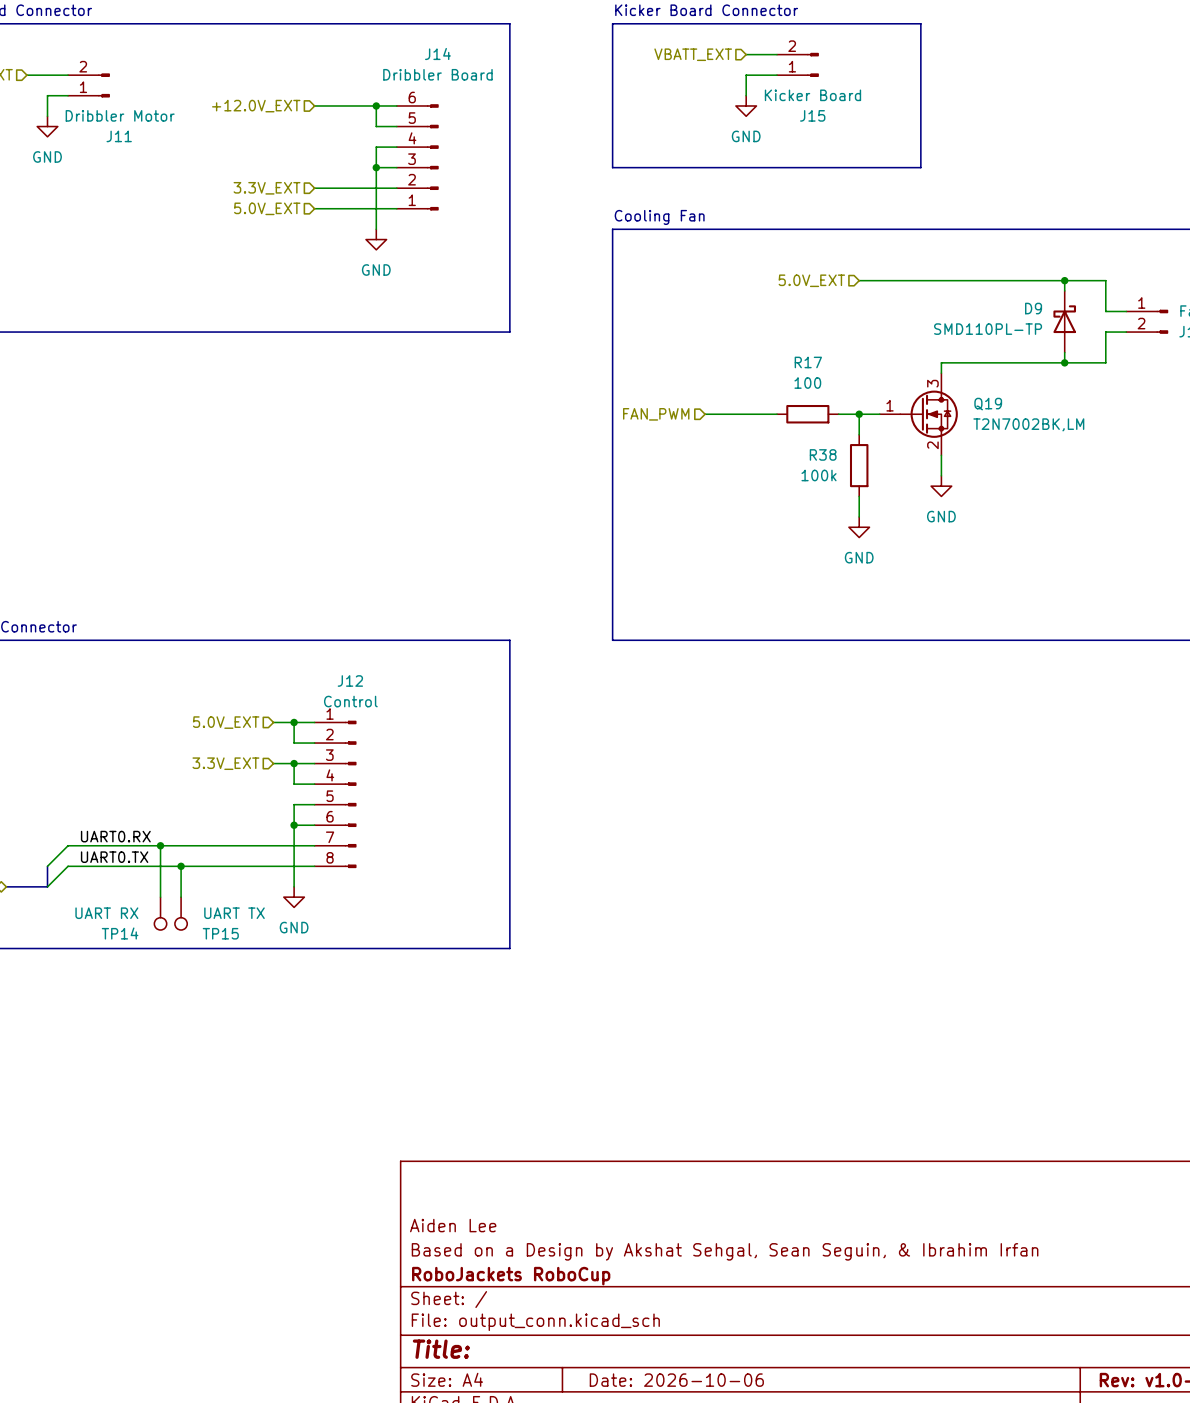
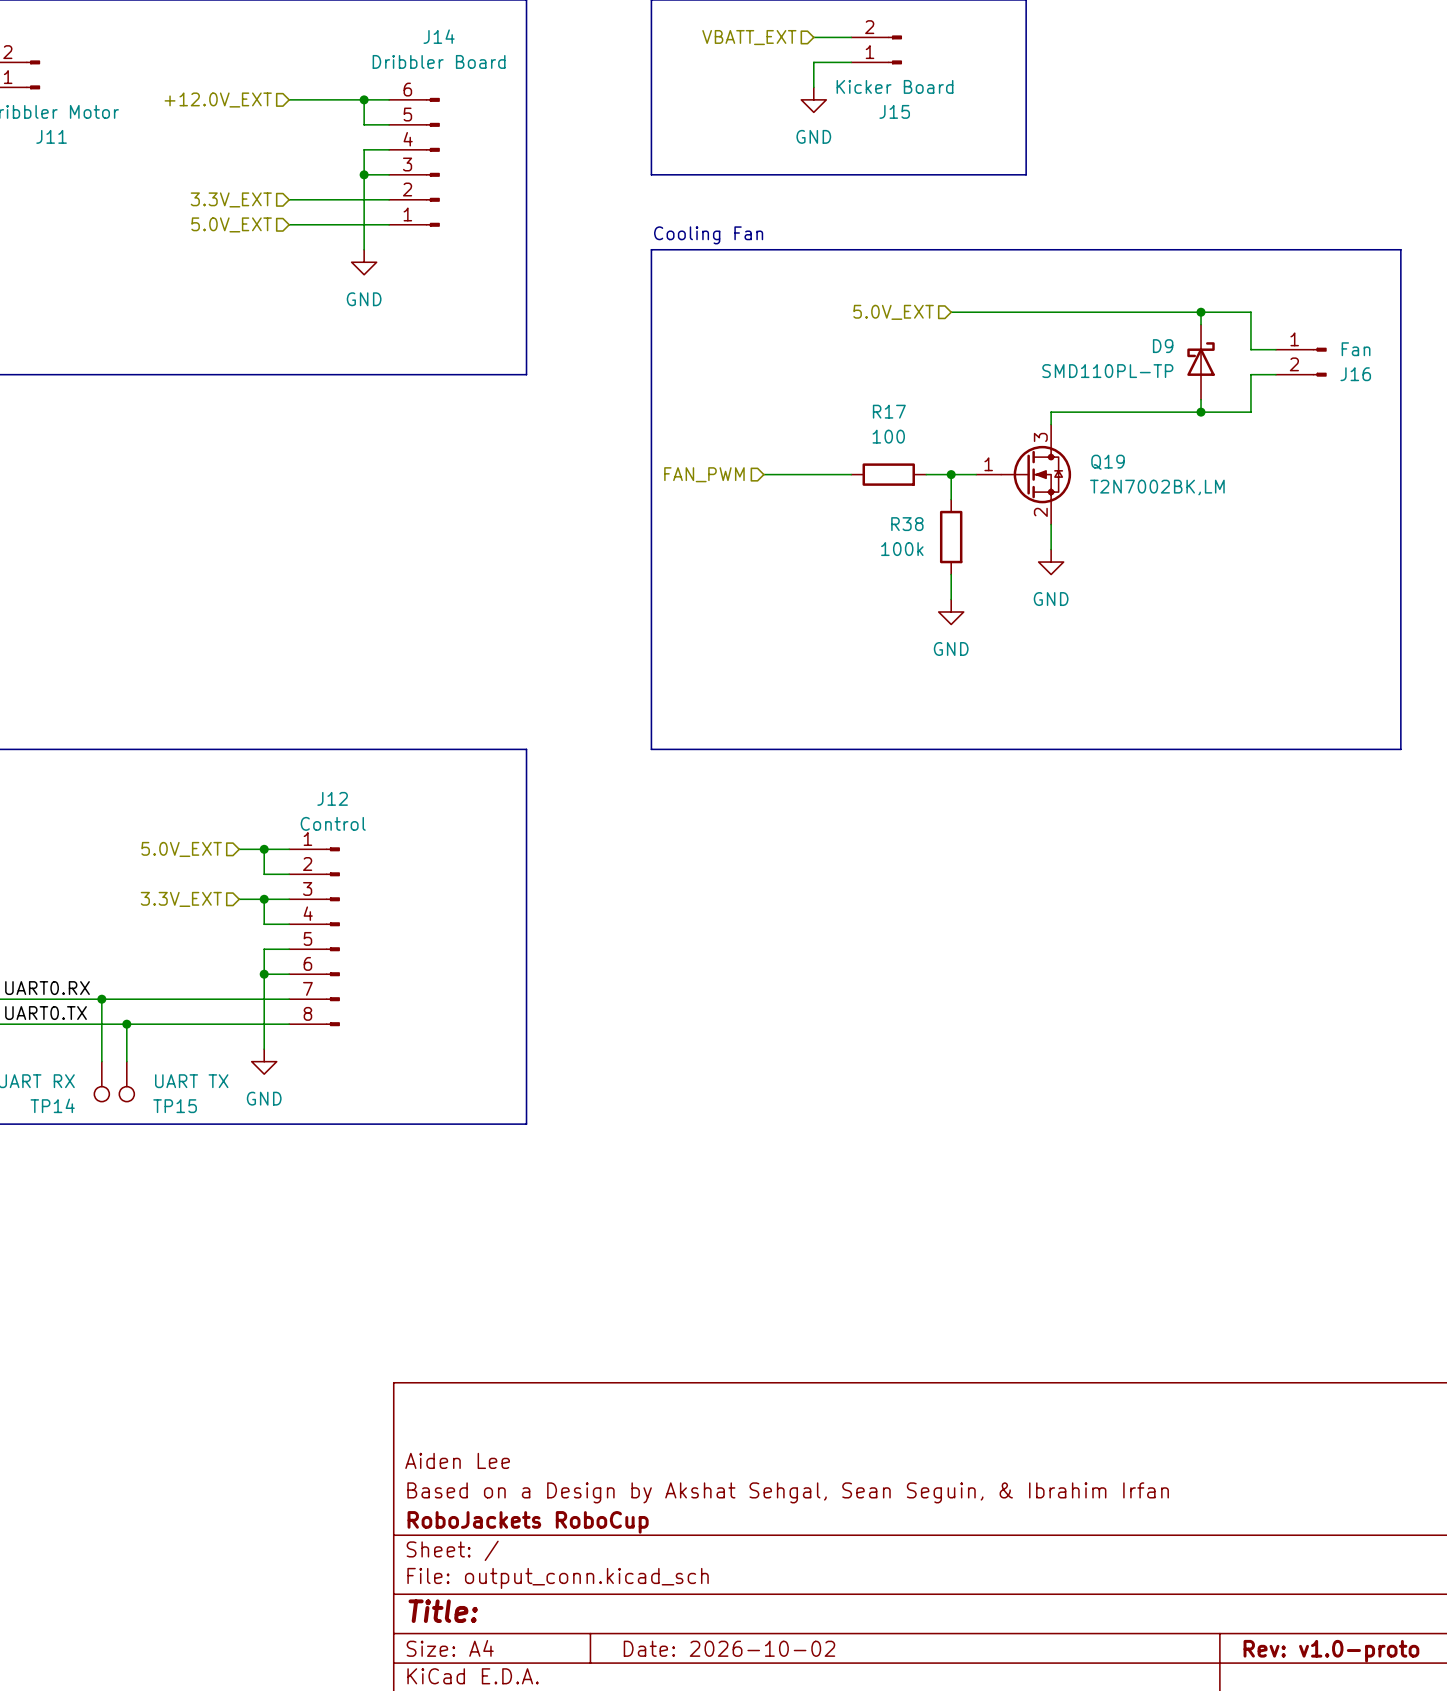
title block: Date: 2026-10-06 (676, 1380) -> Date: 2026-10-02 (729, 1648)

